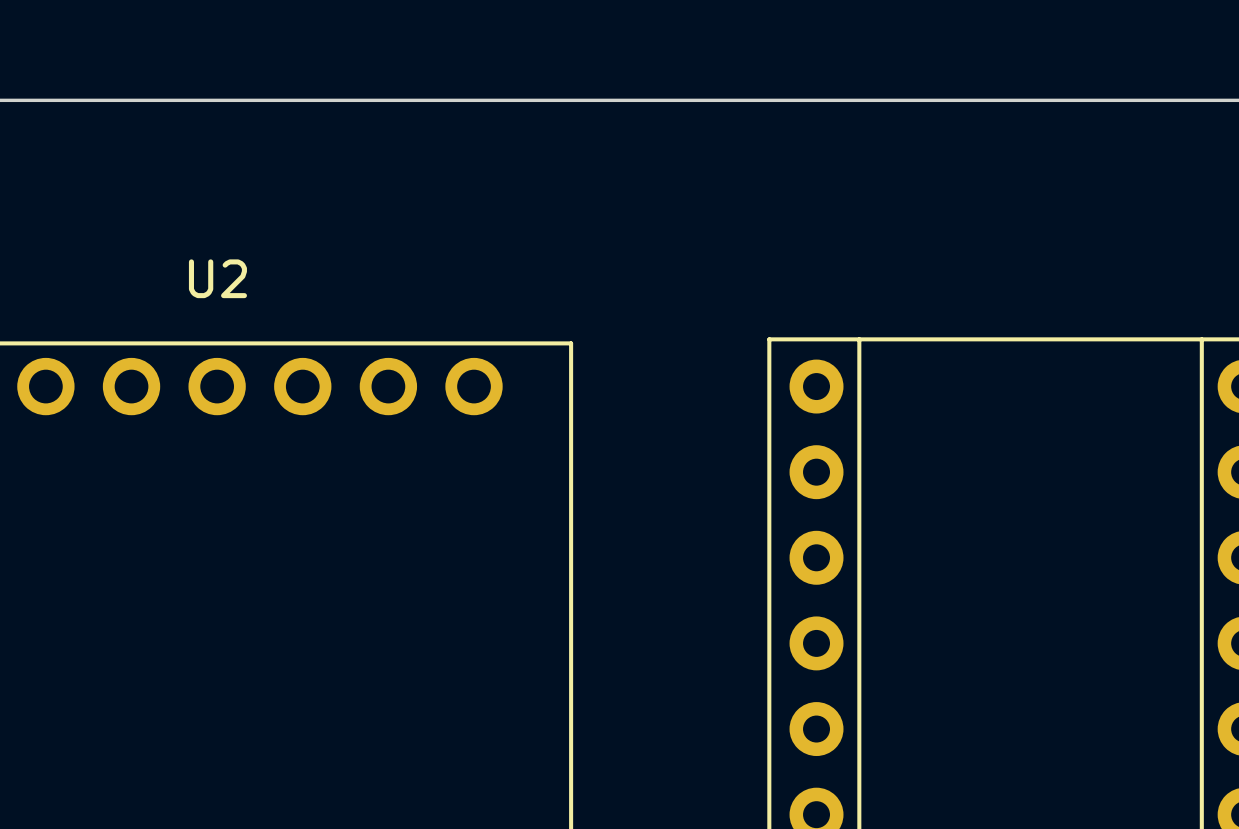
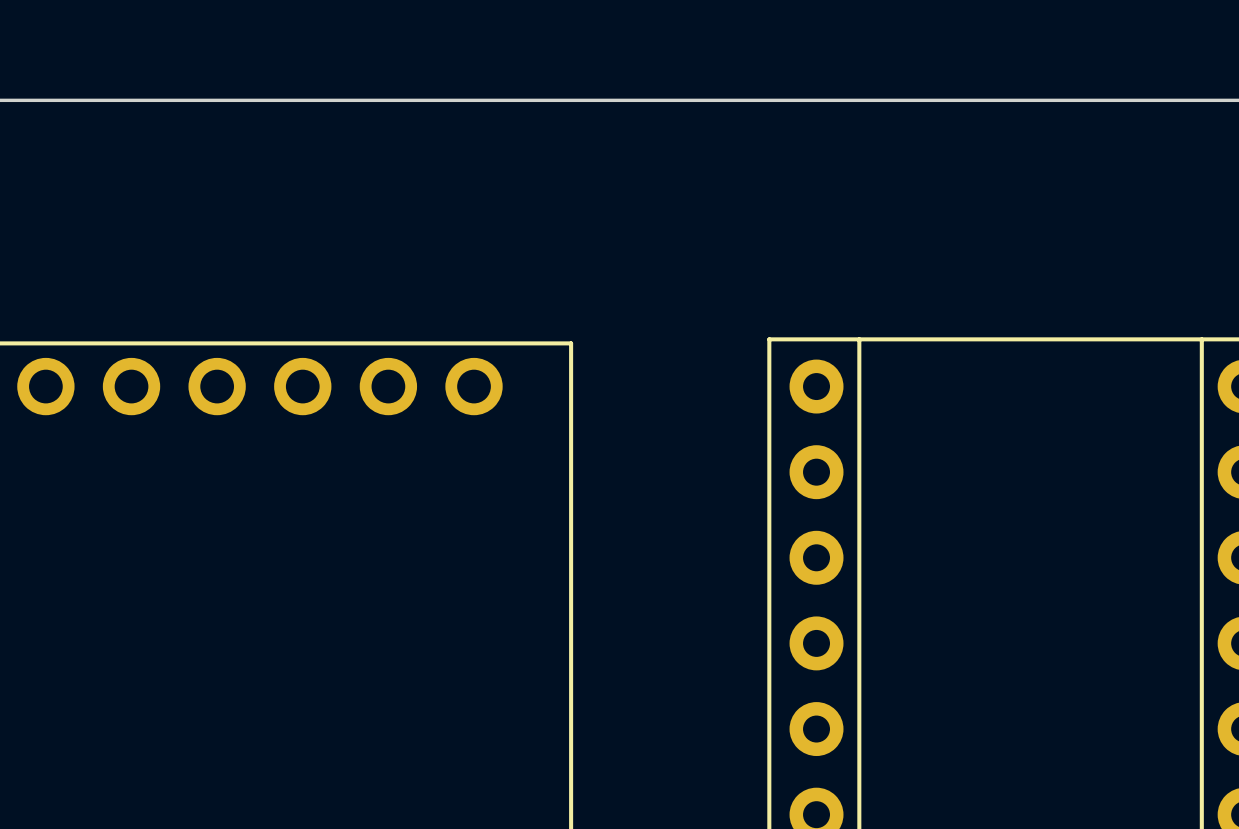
U2 name: U2 (217, 278) -> none

